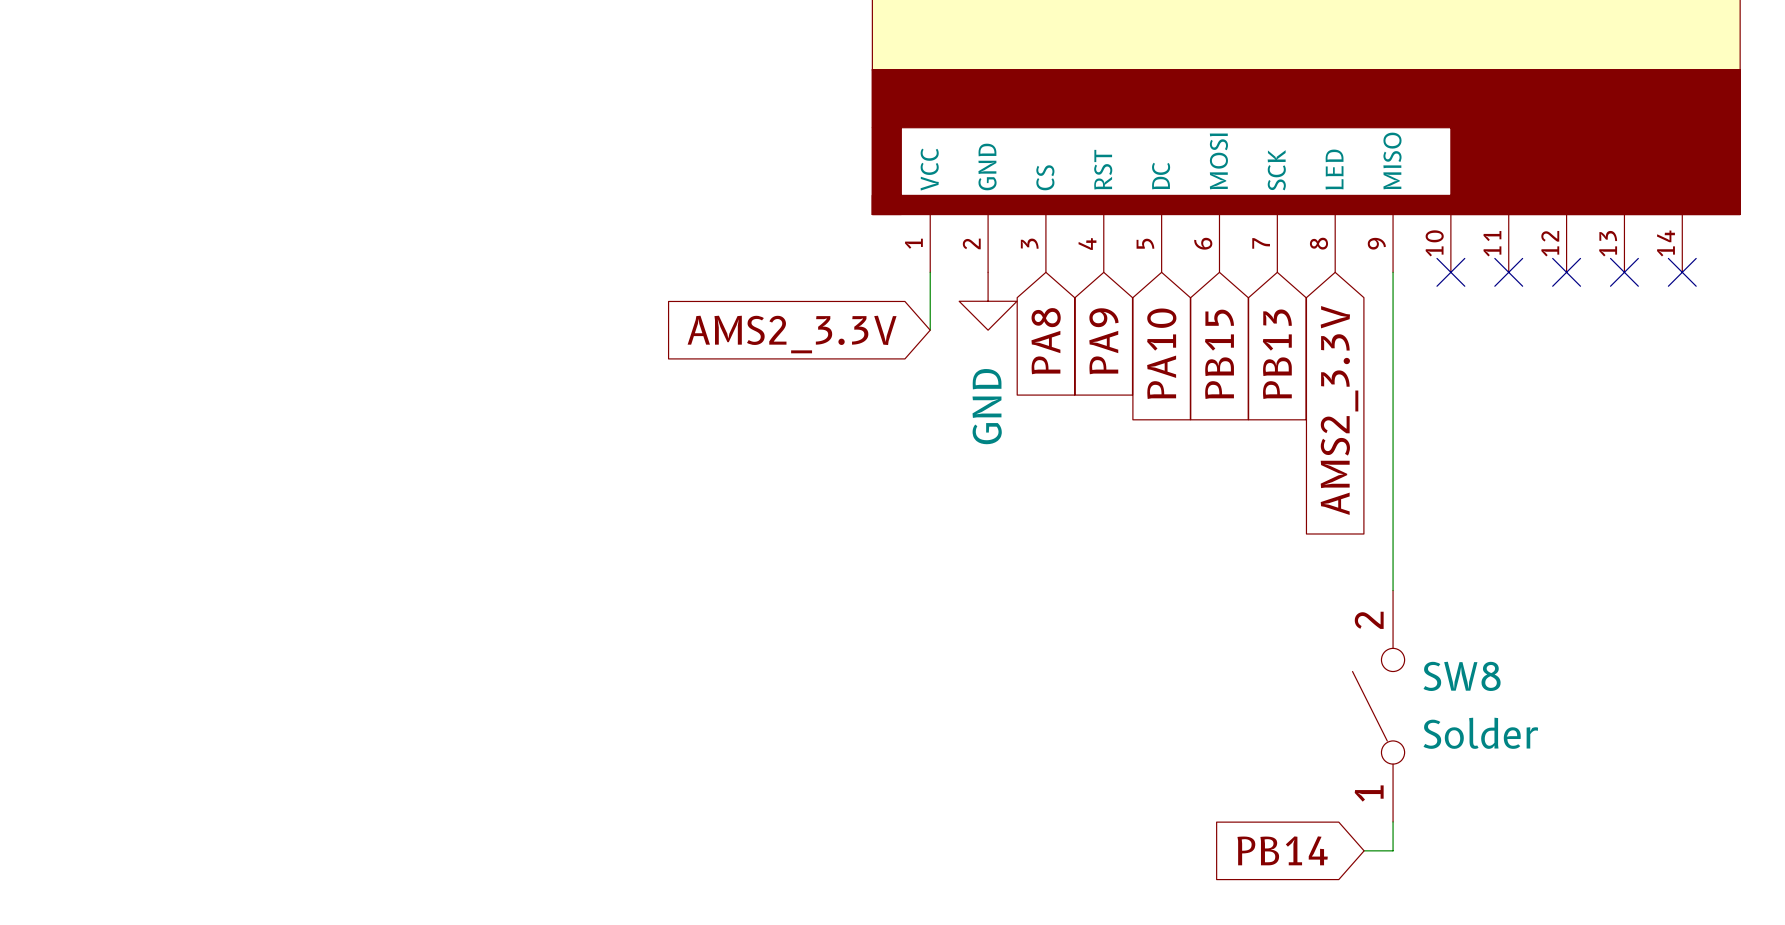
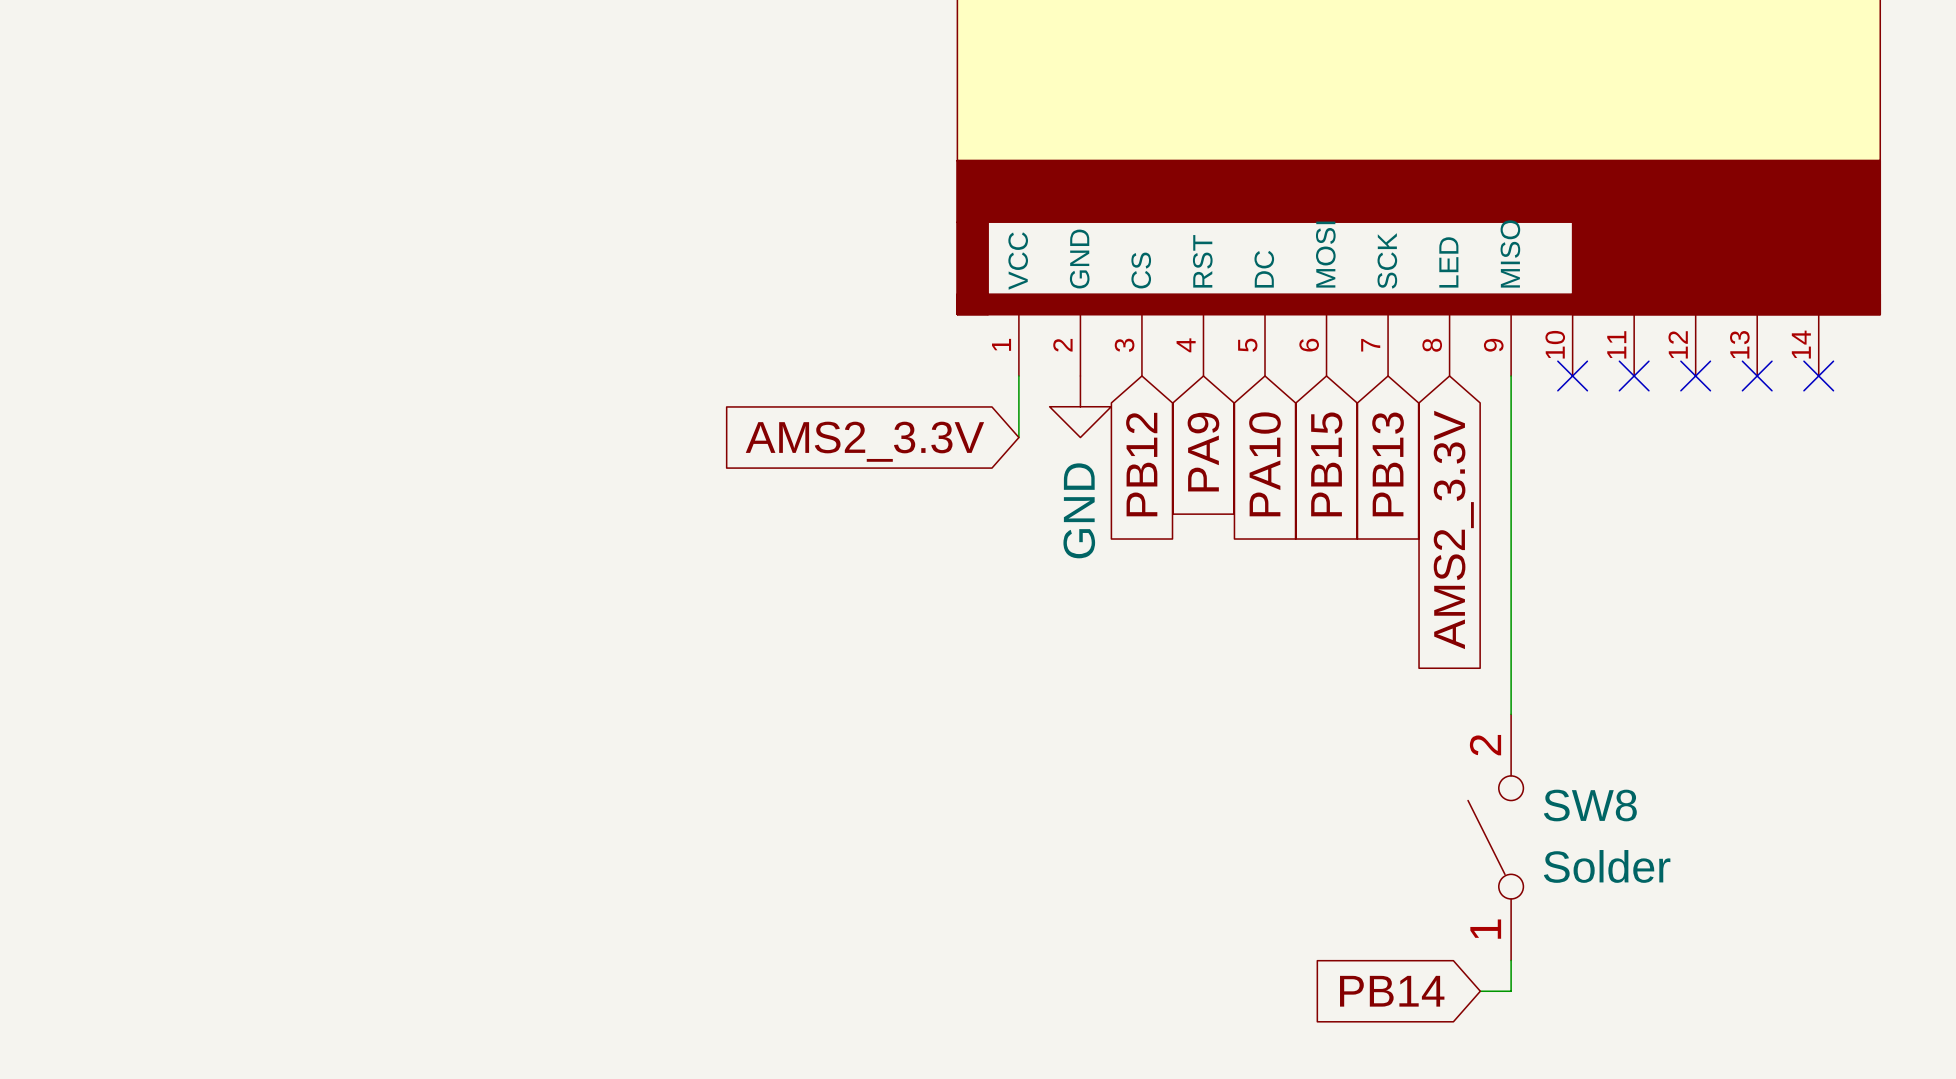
global label: PA8 (1046, 341) -> PB12 (1141, 464)

